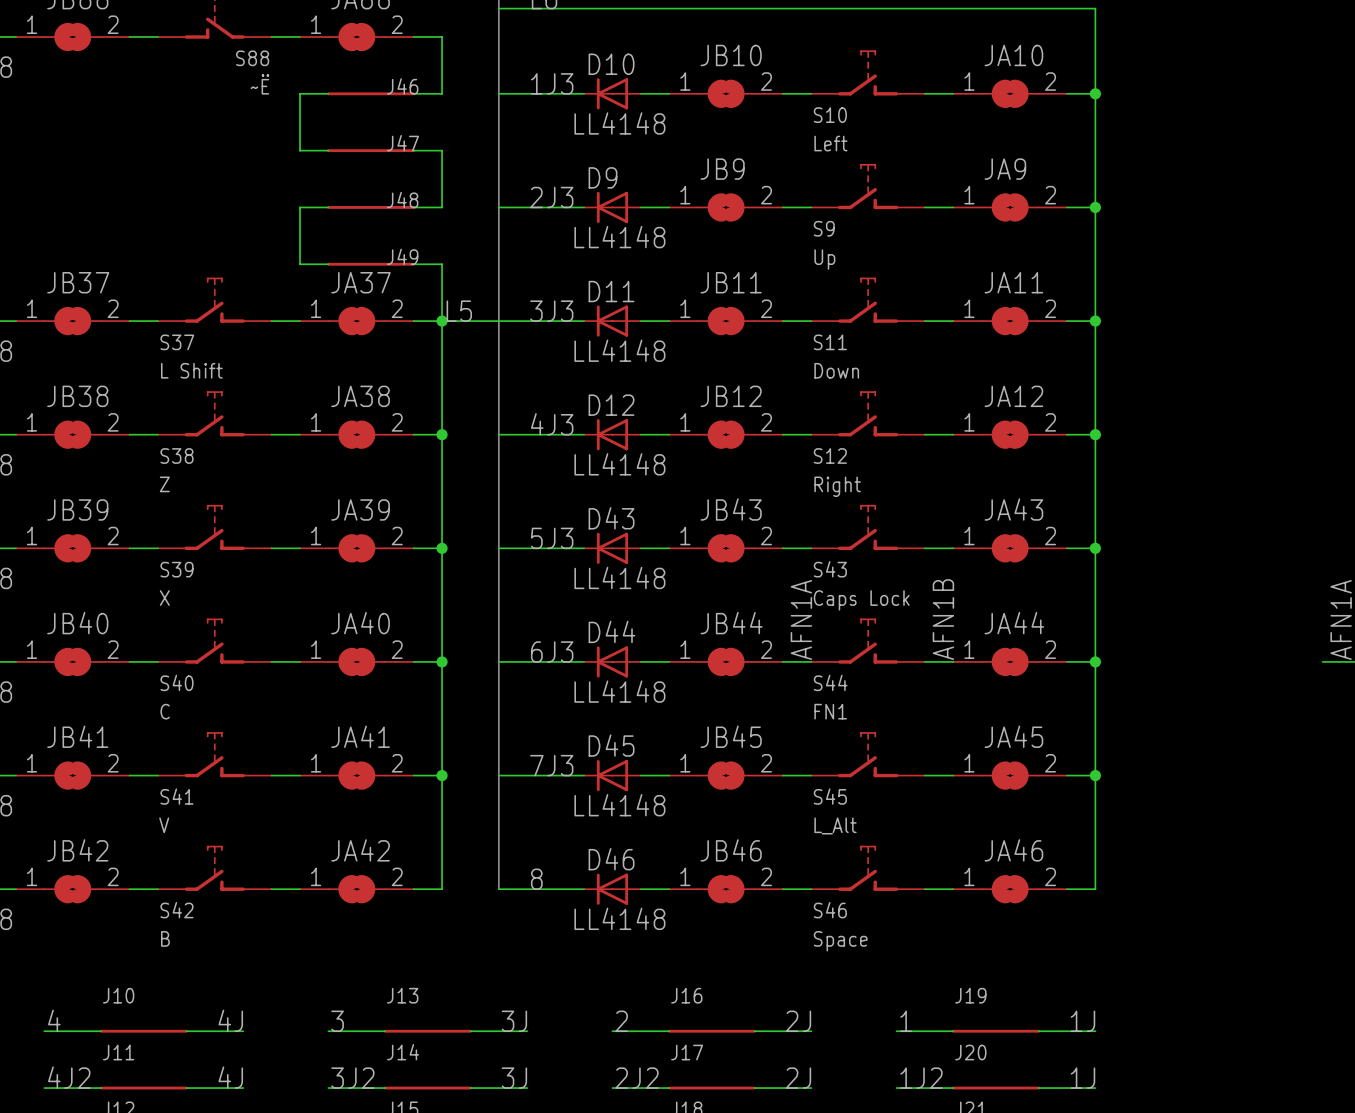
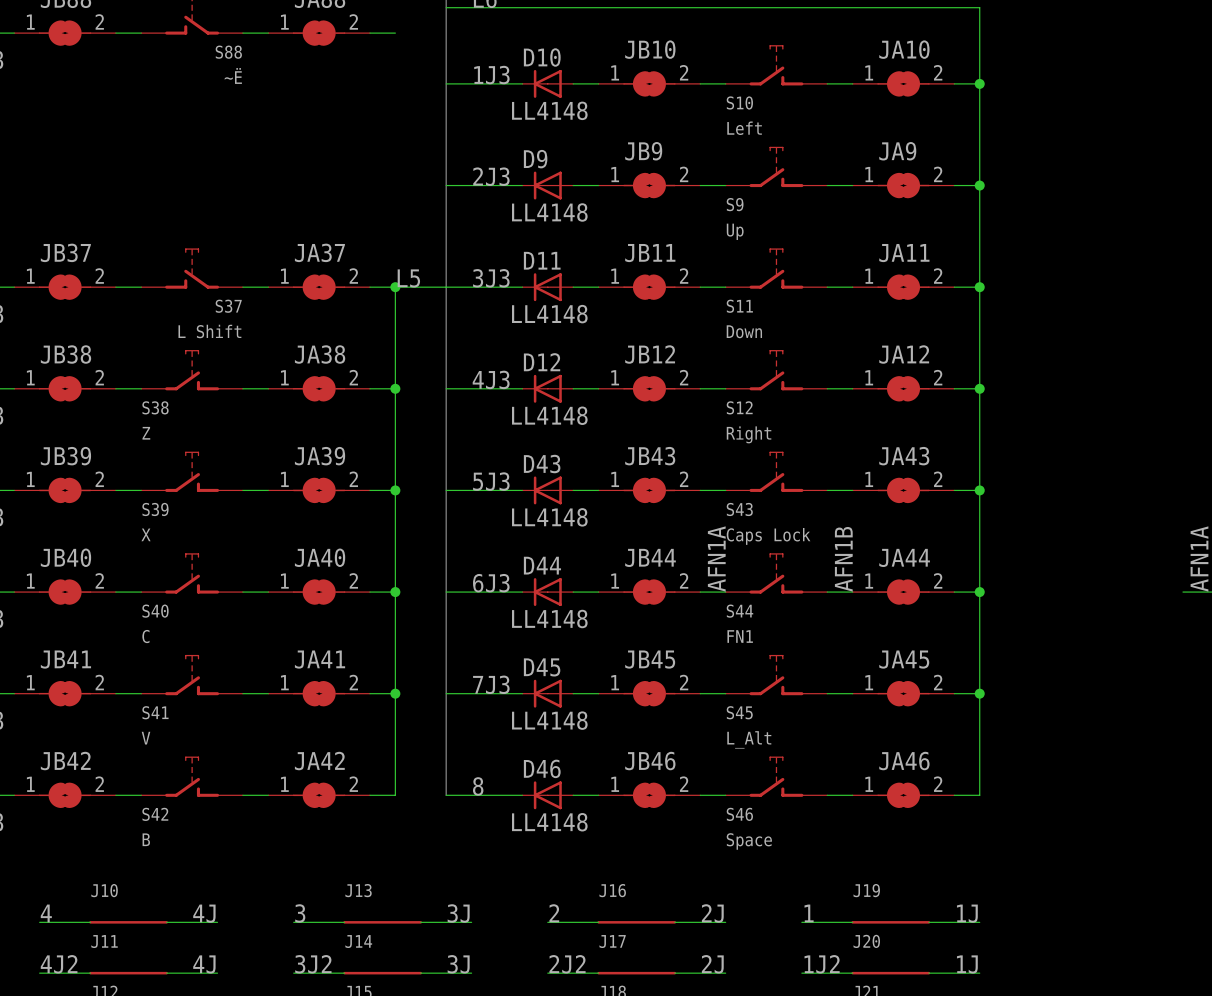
wire: (442, 37) (442, 93) (413, 93) -> none
wire: (328, 93) (300, 93) (300, 150) (328, 150) -> none
J46: (371, 93) -> none
J47: (371, 150) -> none
wire: (413, 150) (442, 150) (442, 207) (413, 207) -> none
wire: (328, 207) (300, 207) (300, 264) (328, 264) -> none
J48: (371, 207) -> none
J49: (371, 264) -> none
wire: (413, 264) (442, 264) (442, 321) -> none
S37 flip: as is (214, 300) -> left-right (192, 268)

